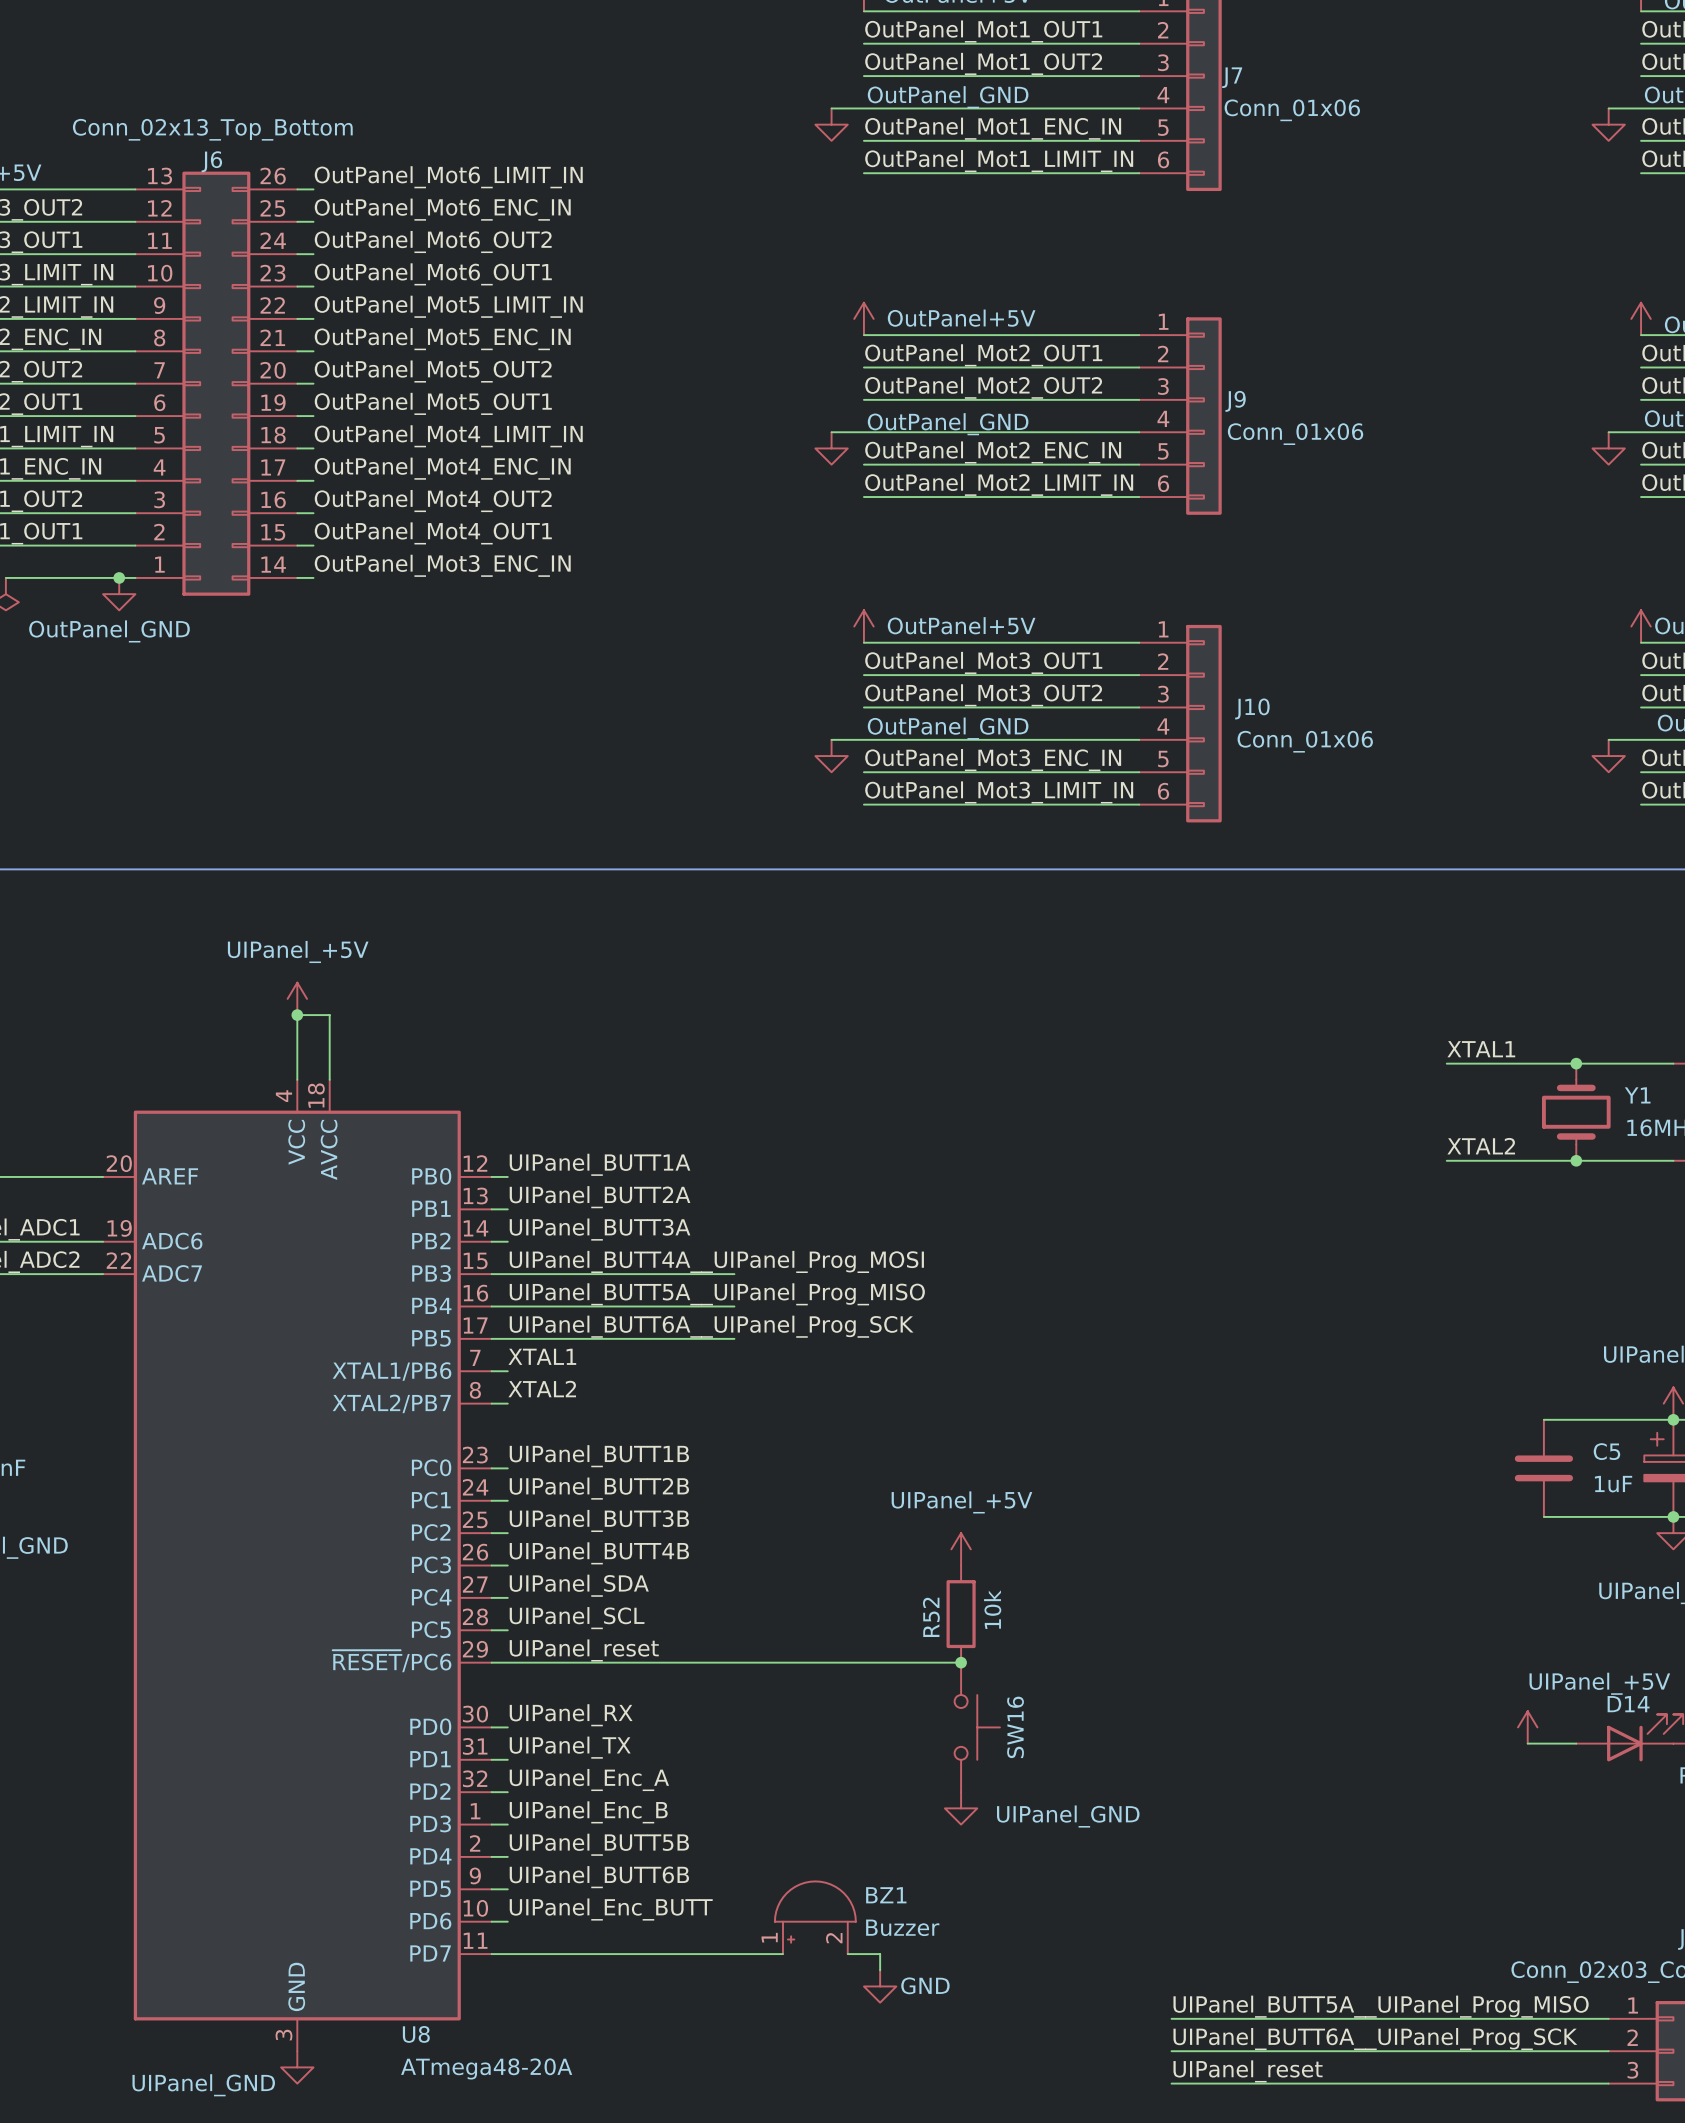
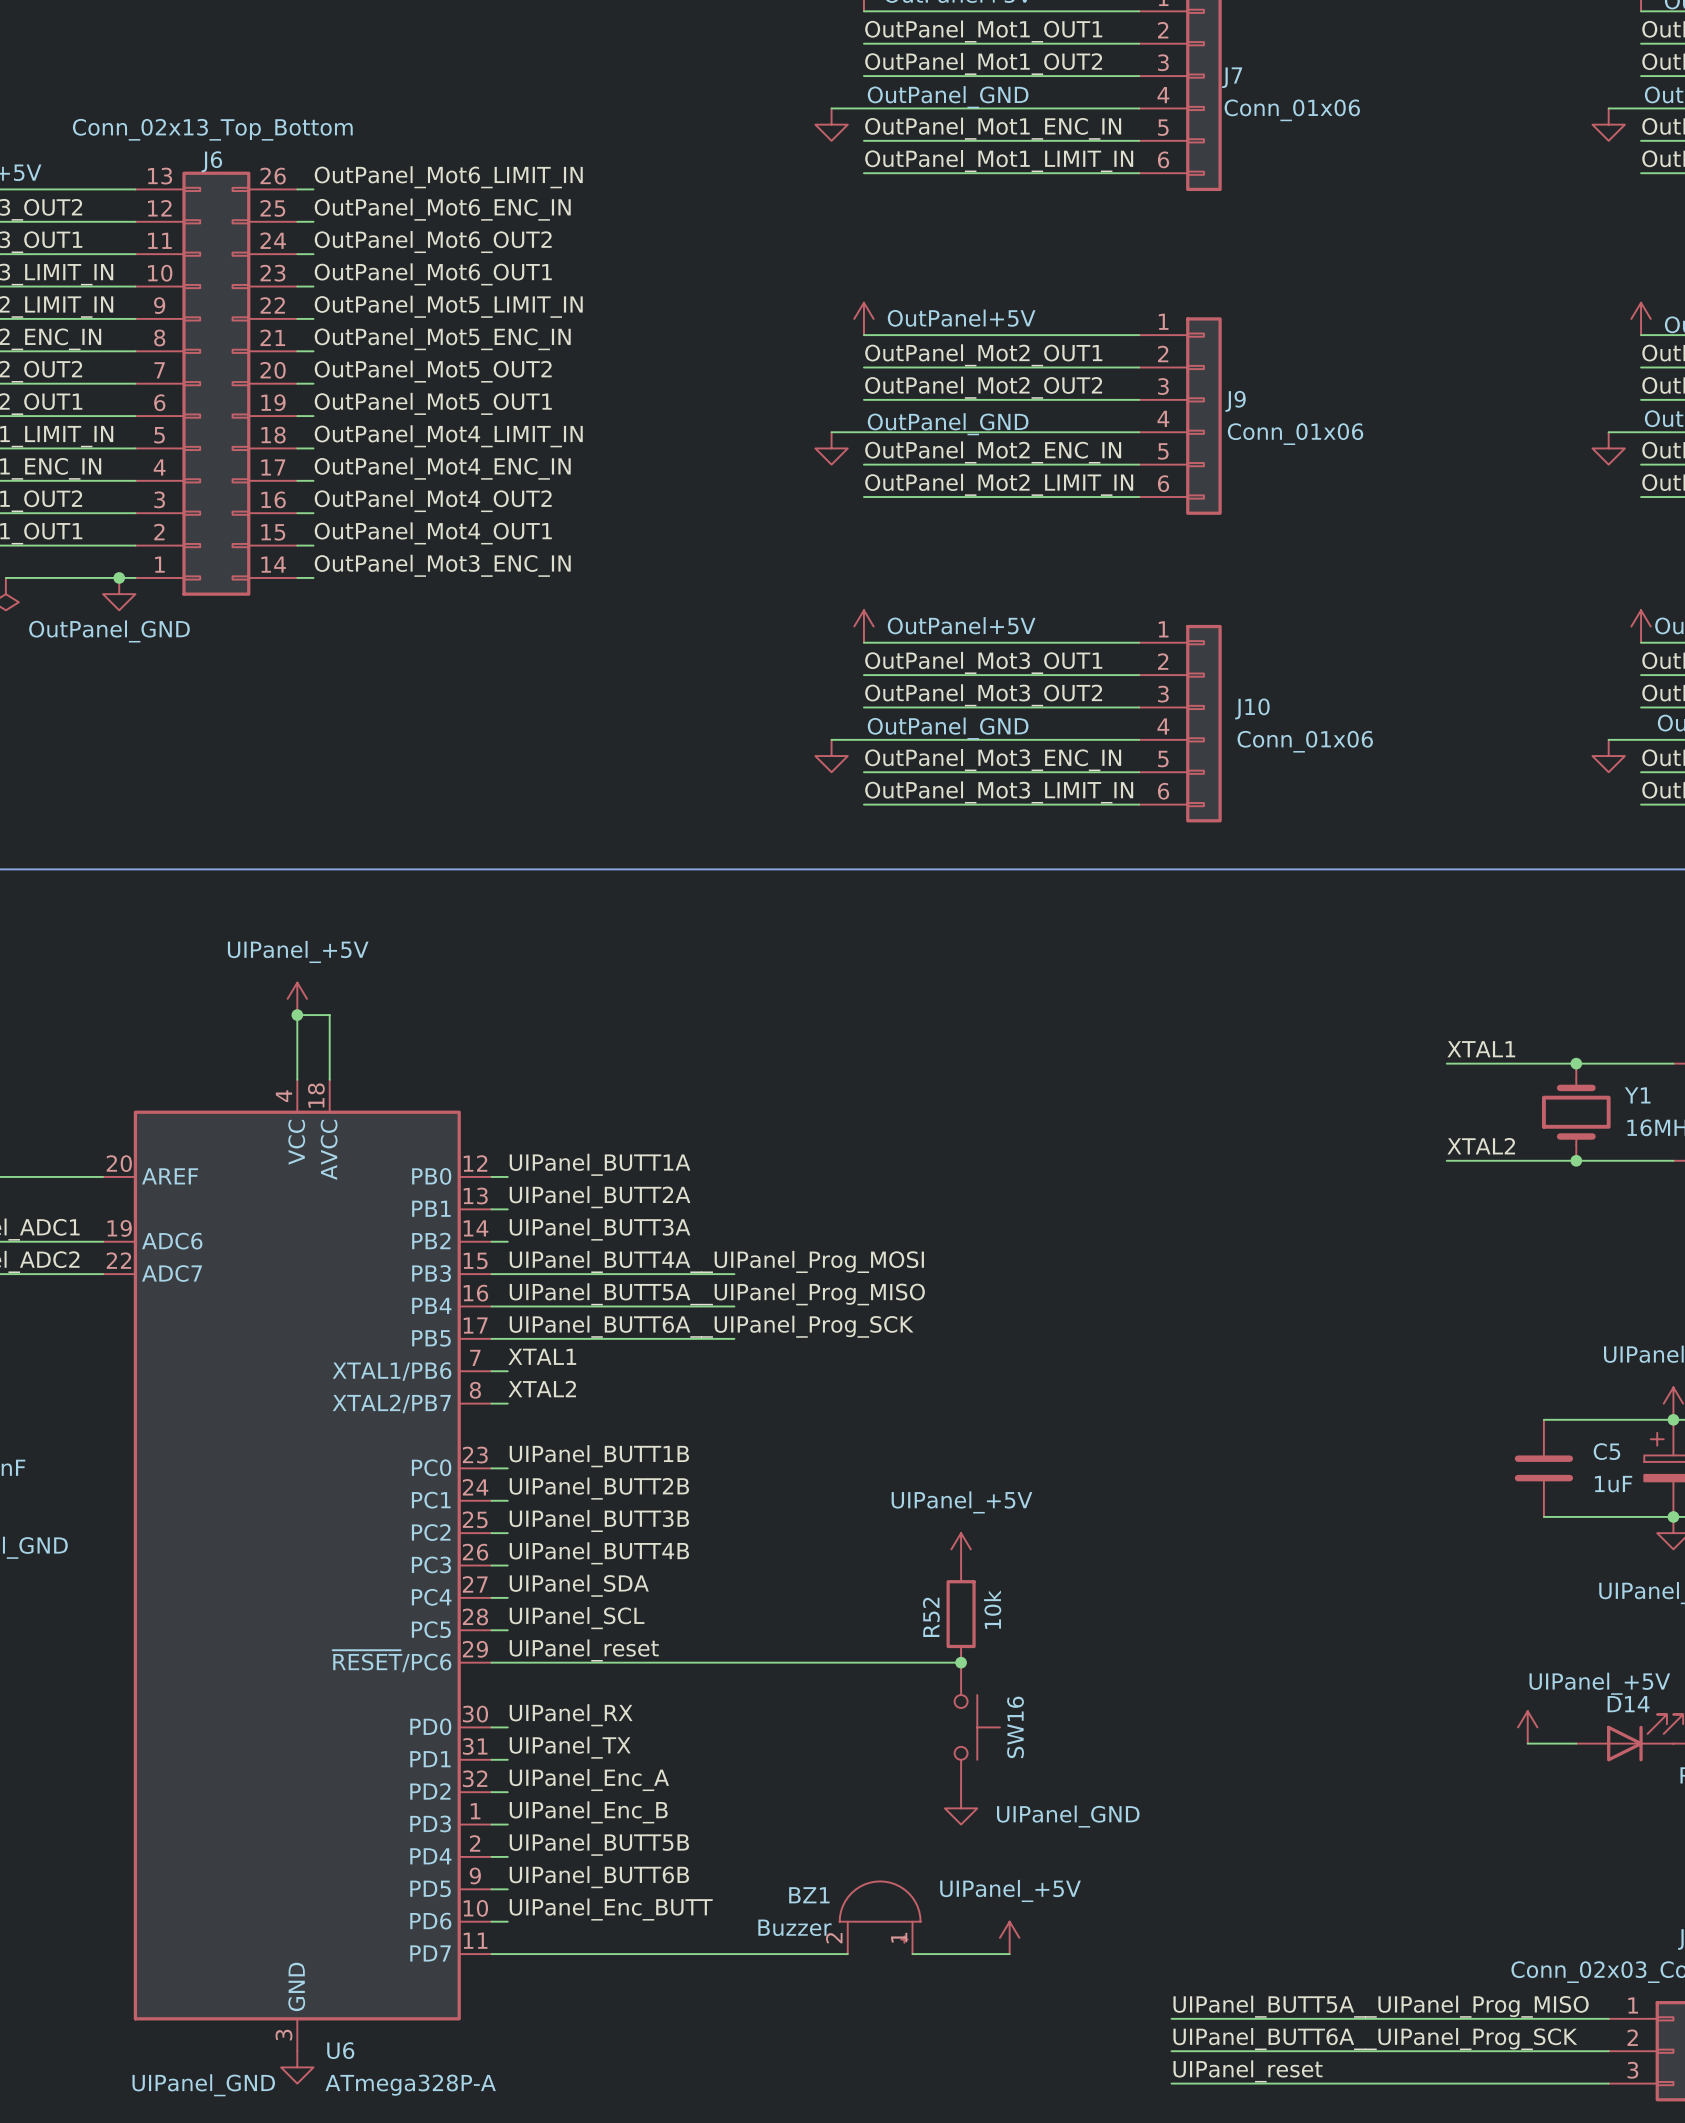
BZ1 flip: as is (815, 1912) -> left-right (880, 1912)
BZ1 position: (815, 1917) -> (880, 1917)
power symbol: none -> UIPanel_+5V (1009, 1937)
wire: (847, 1954) (880, 1954) (880, 1970) -> (847, 1954) (783, 1954)
wire: none -> (912, 1954) (1009, 1954)
power symbol: GND (880, 1986) -> none
U8 name: U8 (416, 2034) -> U6 (340, 2050)
U8 value: ATmega48-20A (486, 2068) -> ATmega328P-A (410, 2085)

